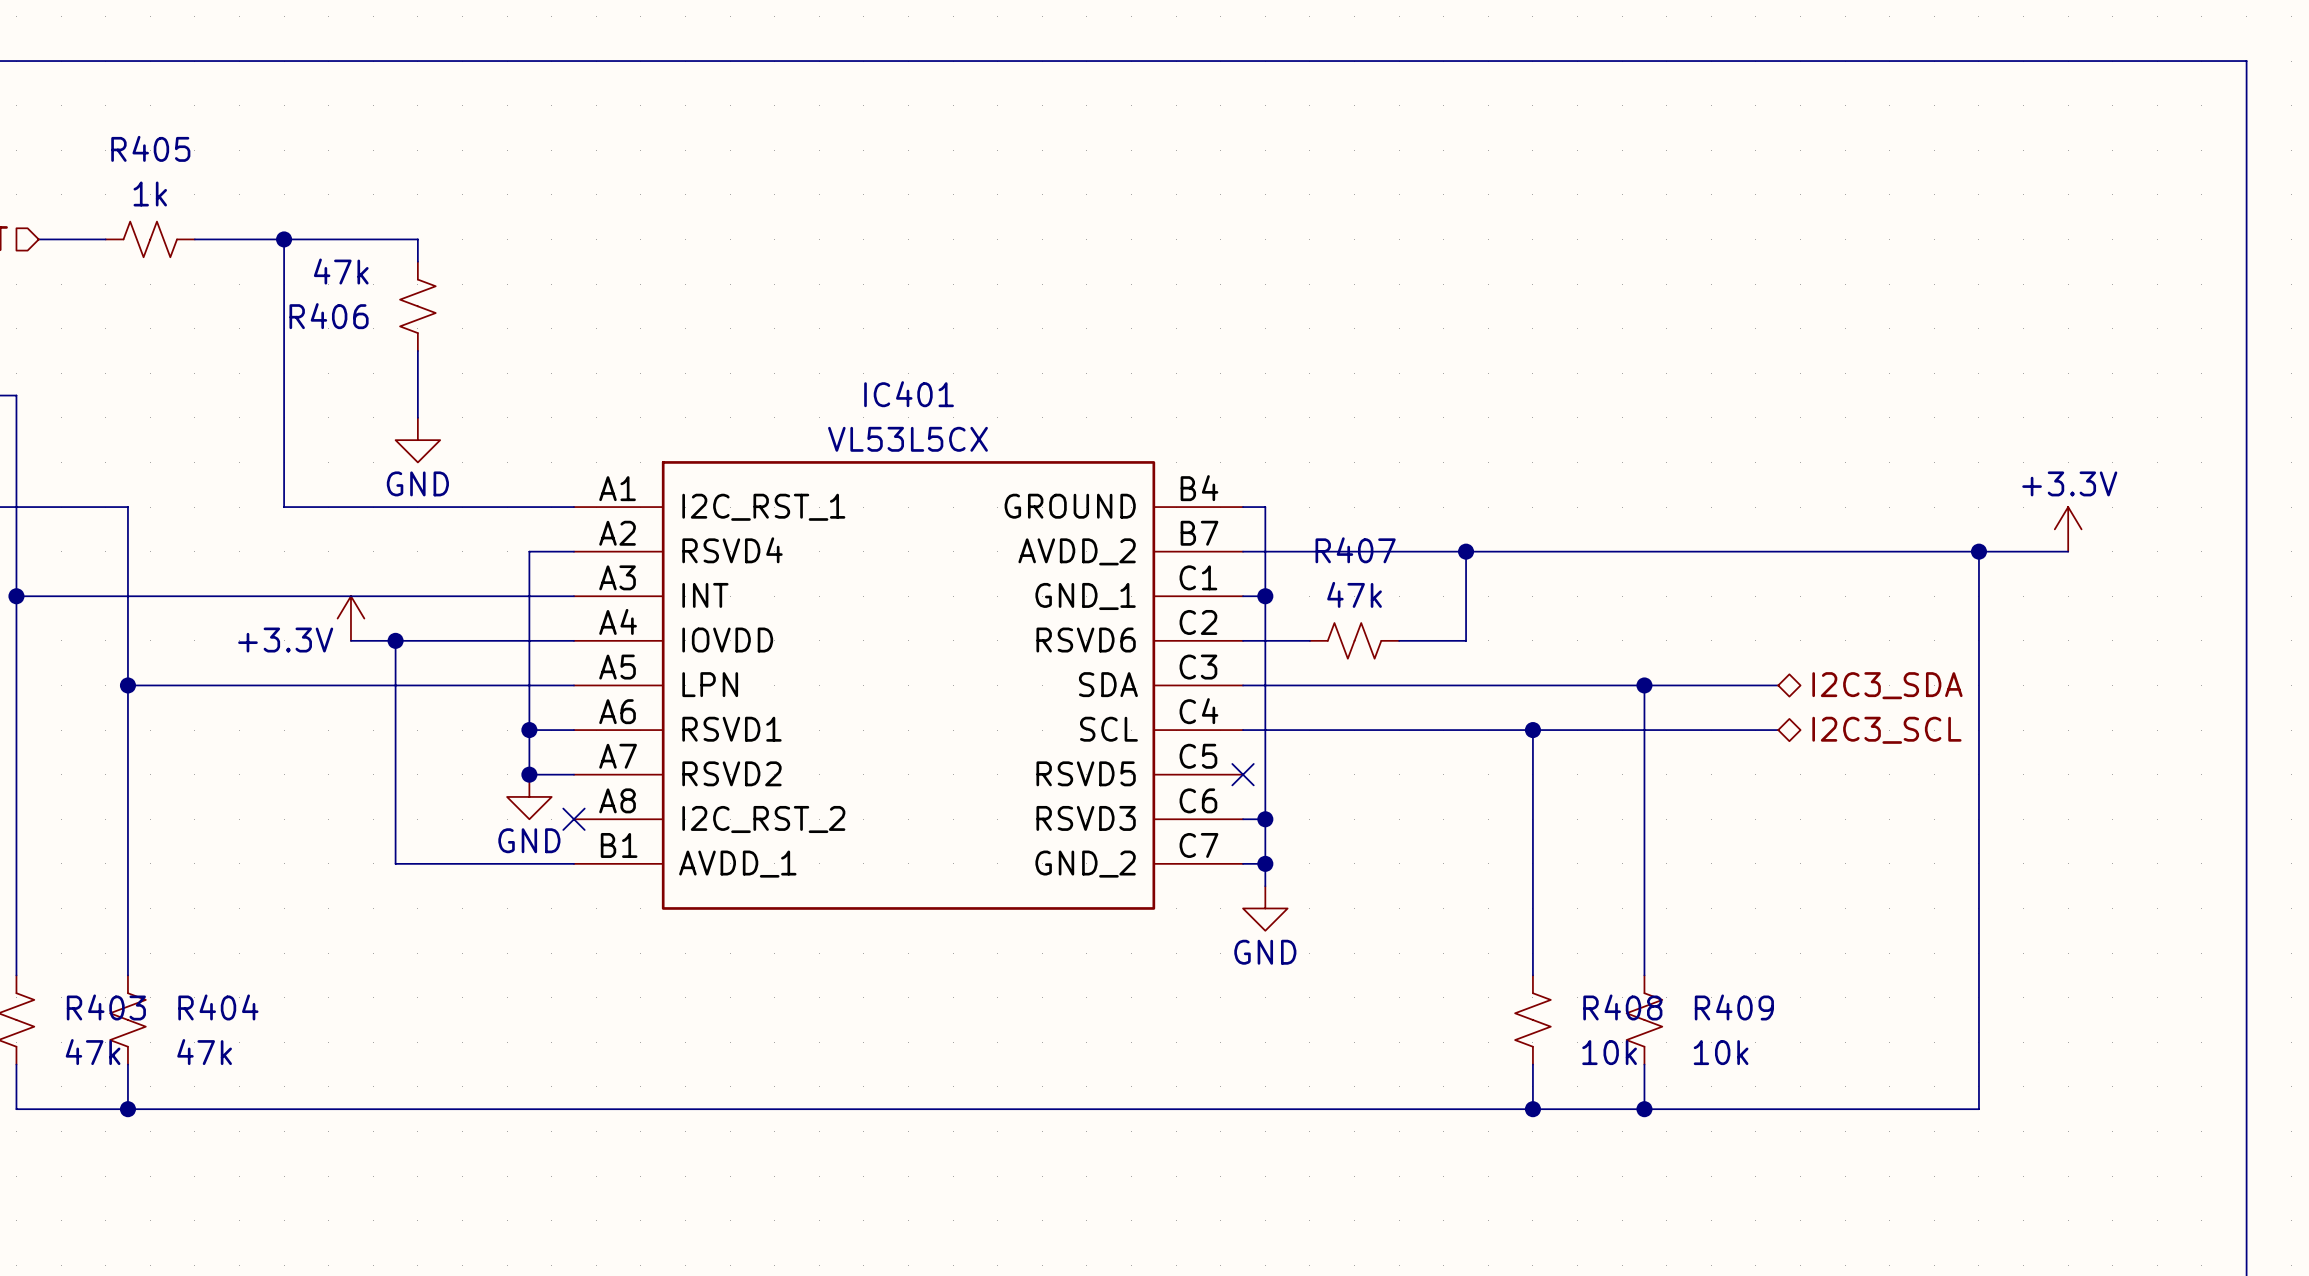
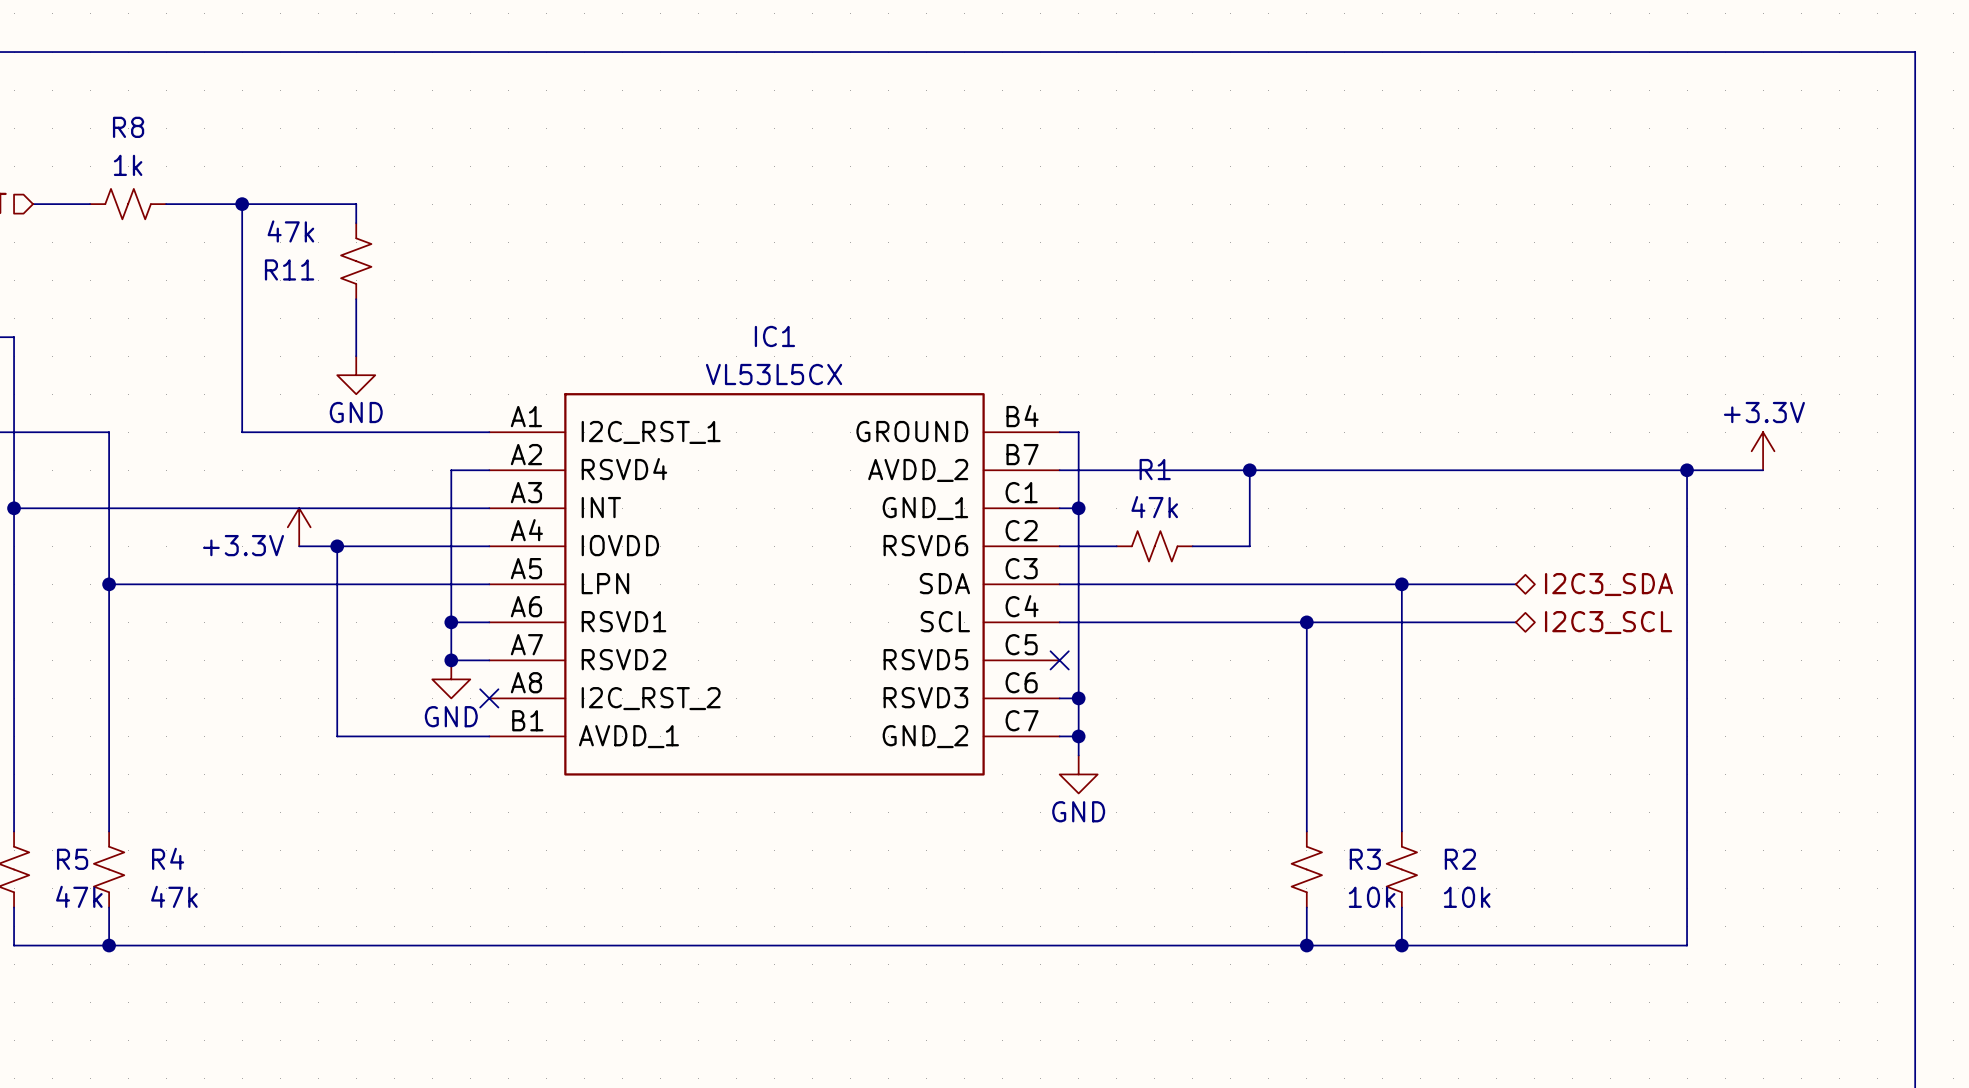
R405 name: R405 (150, 148) -> R8 (128, 127)
R406 name: R406 (329, 316) -> R11 (289, 269)
IC401 name: IC401 (909, 394) -> IC1 (774, 336)
R407 name: R407 (1355, 550) -> R1 (1155, 469)
R403 name: R403 (106, 1007) -> R5 (72, 859)
R404 name: R404 (218, 1007) -> R4 (168, 858)
R408 name: R408 (1622, 1007) -> R3 (1365, 859)
R409 name: R409 (1734, 1007) -> R2 (1460, 859)

